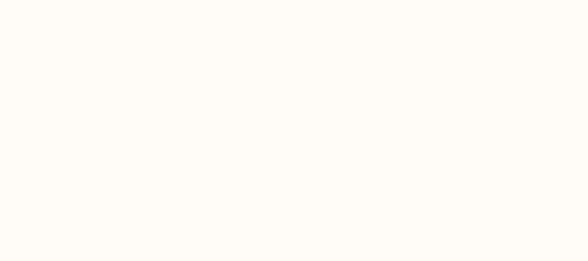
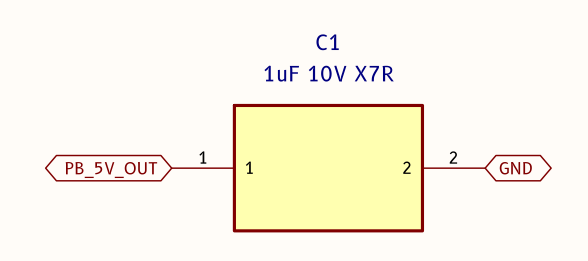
C1: none -> 1uF 10V X7R (328, 168)
global label: none -> GND (515, 168)
global label: none -> PB_5V_OUT (111, 170)

